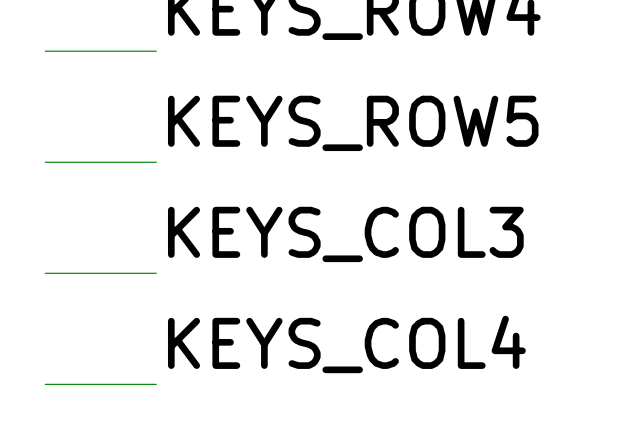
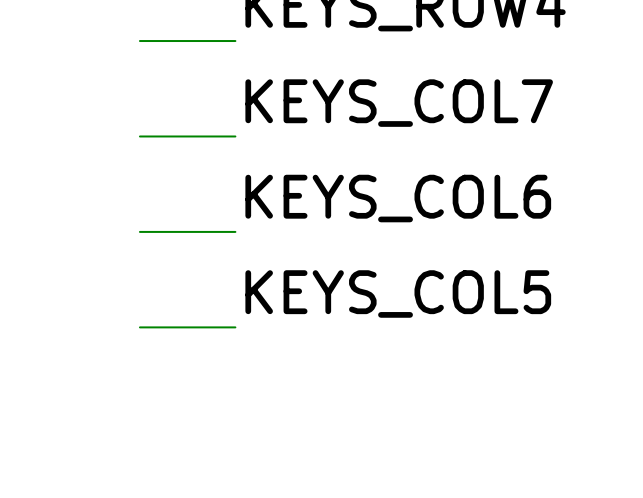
label: KEYS_ROW5 (353, 123) -> KEYS_COL7 (399, 103)
label: KEYS_COL3 (345, 234) -> KEYS_COL6 (398, 198)
label: KEYS_COL4 (346, 344) -> KEYS_COL5 (398, 293)

